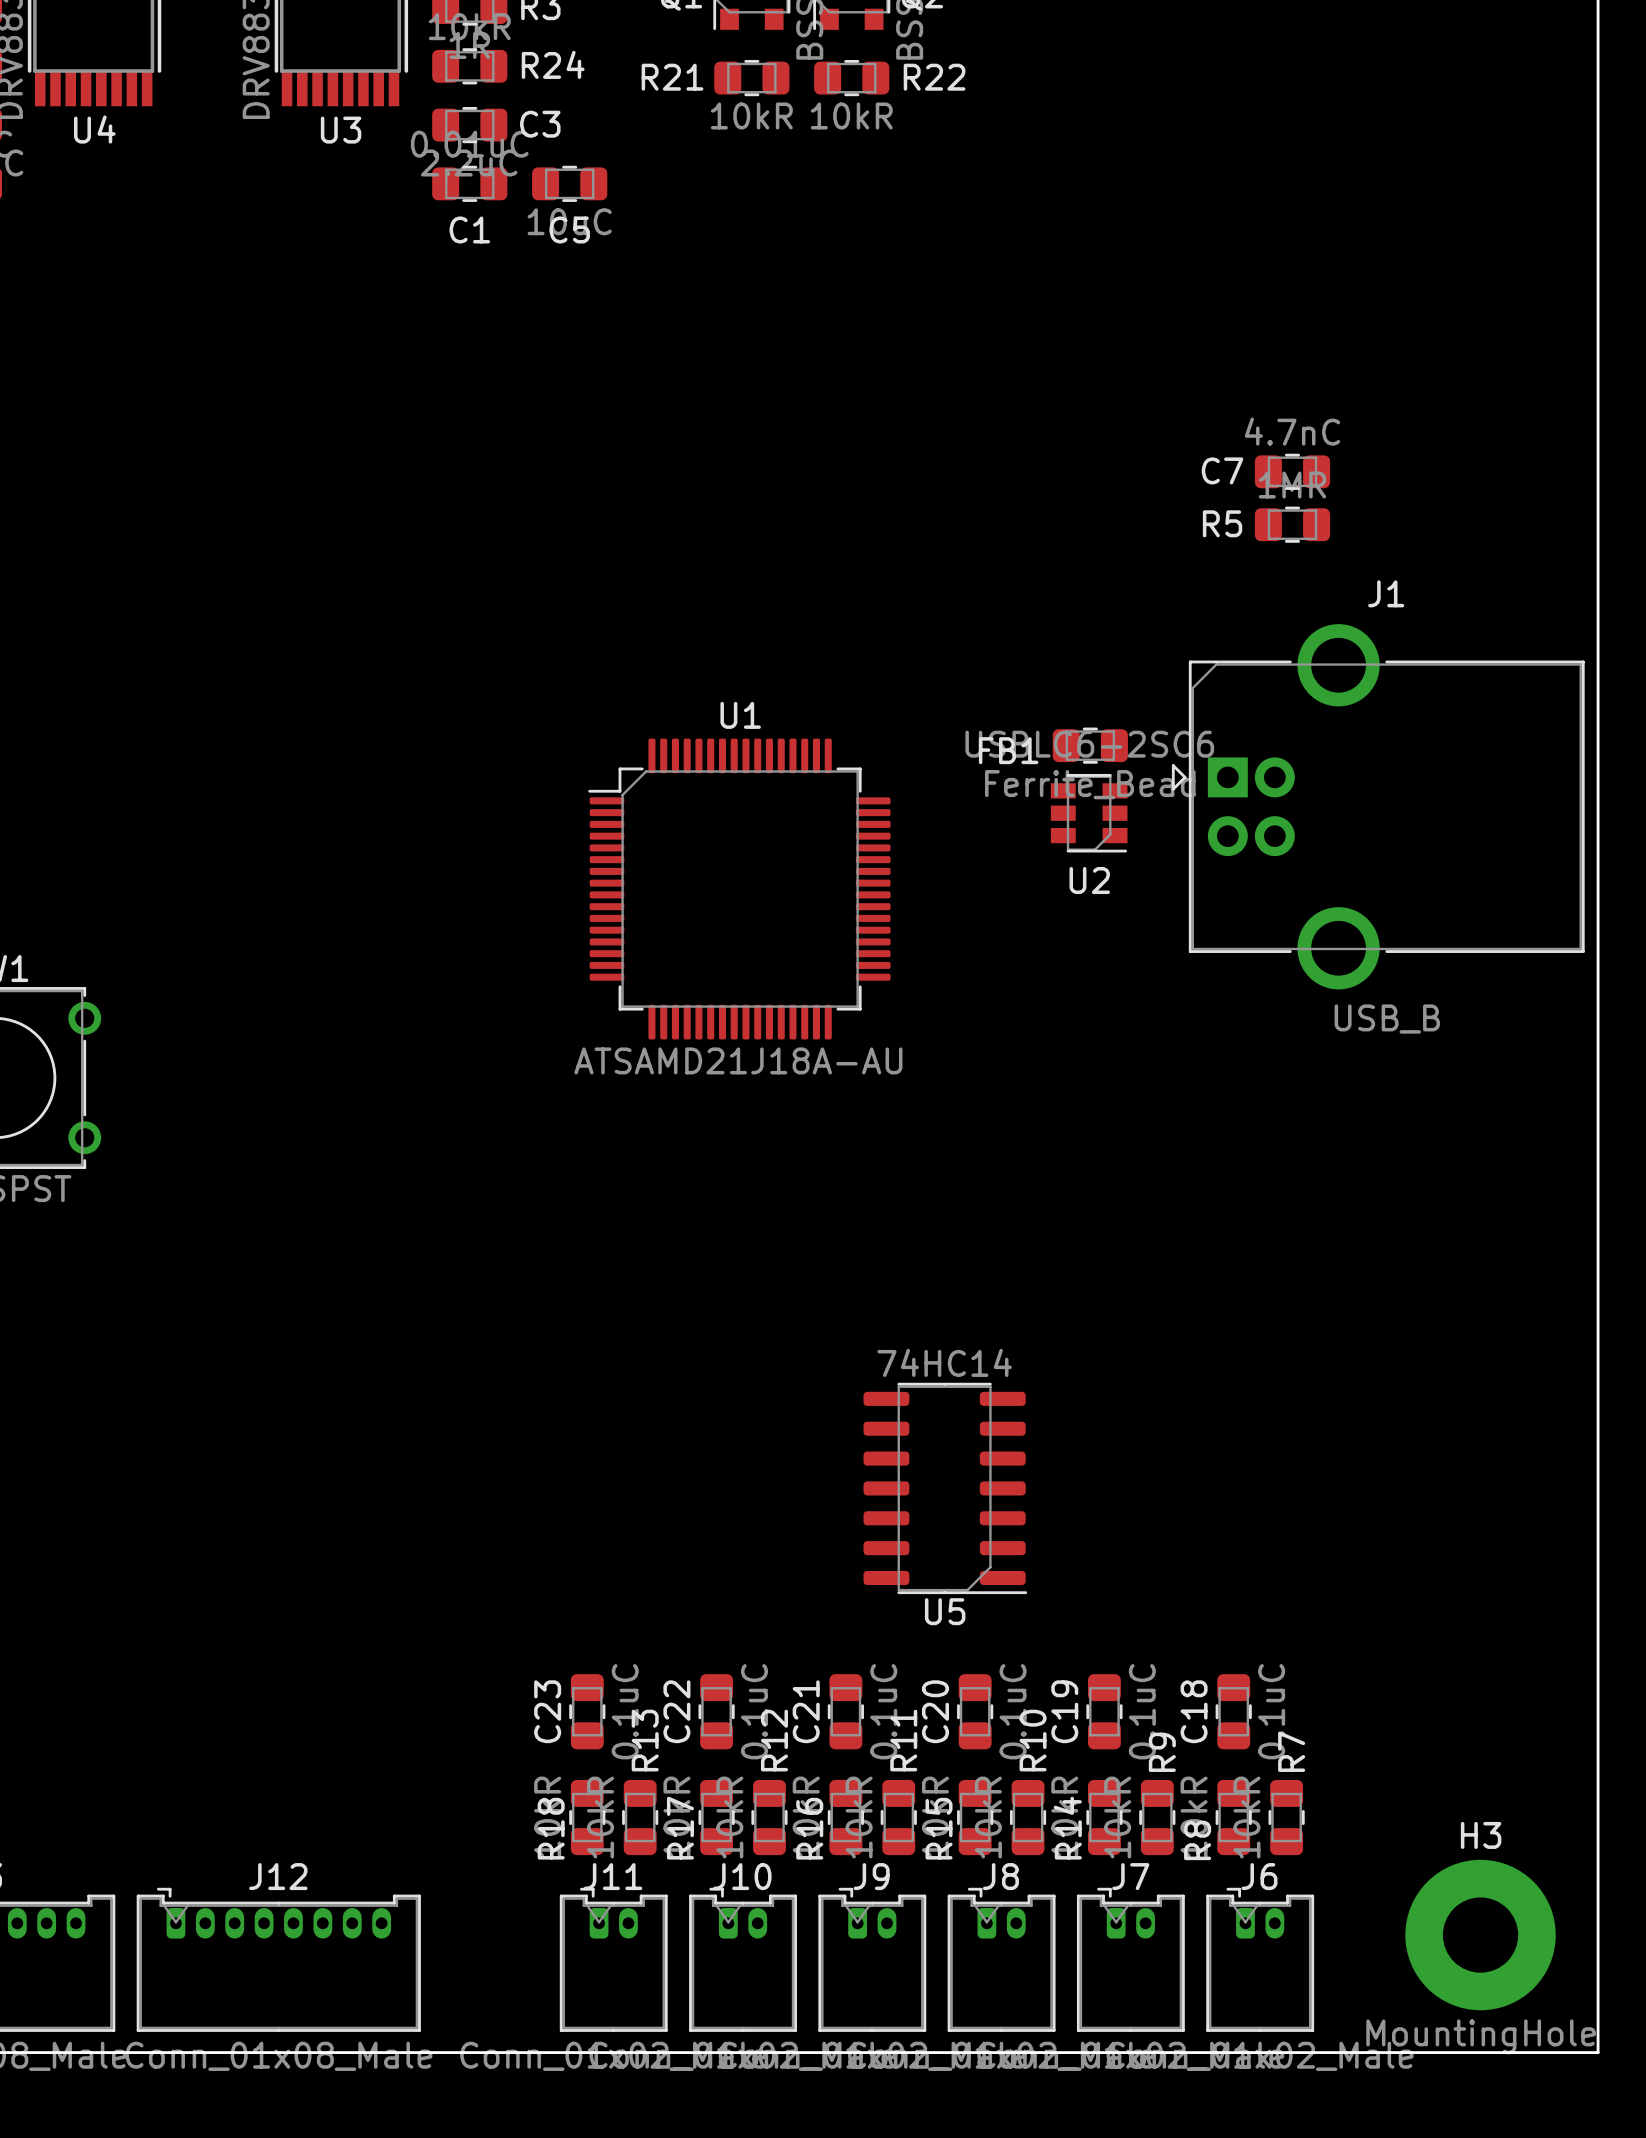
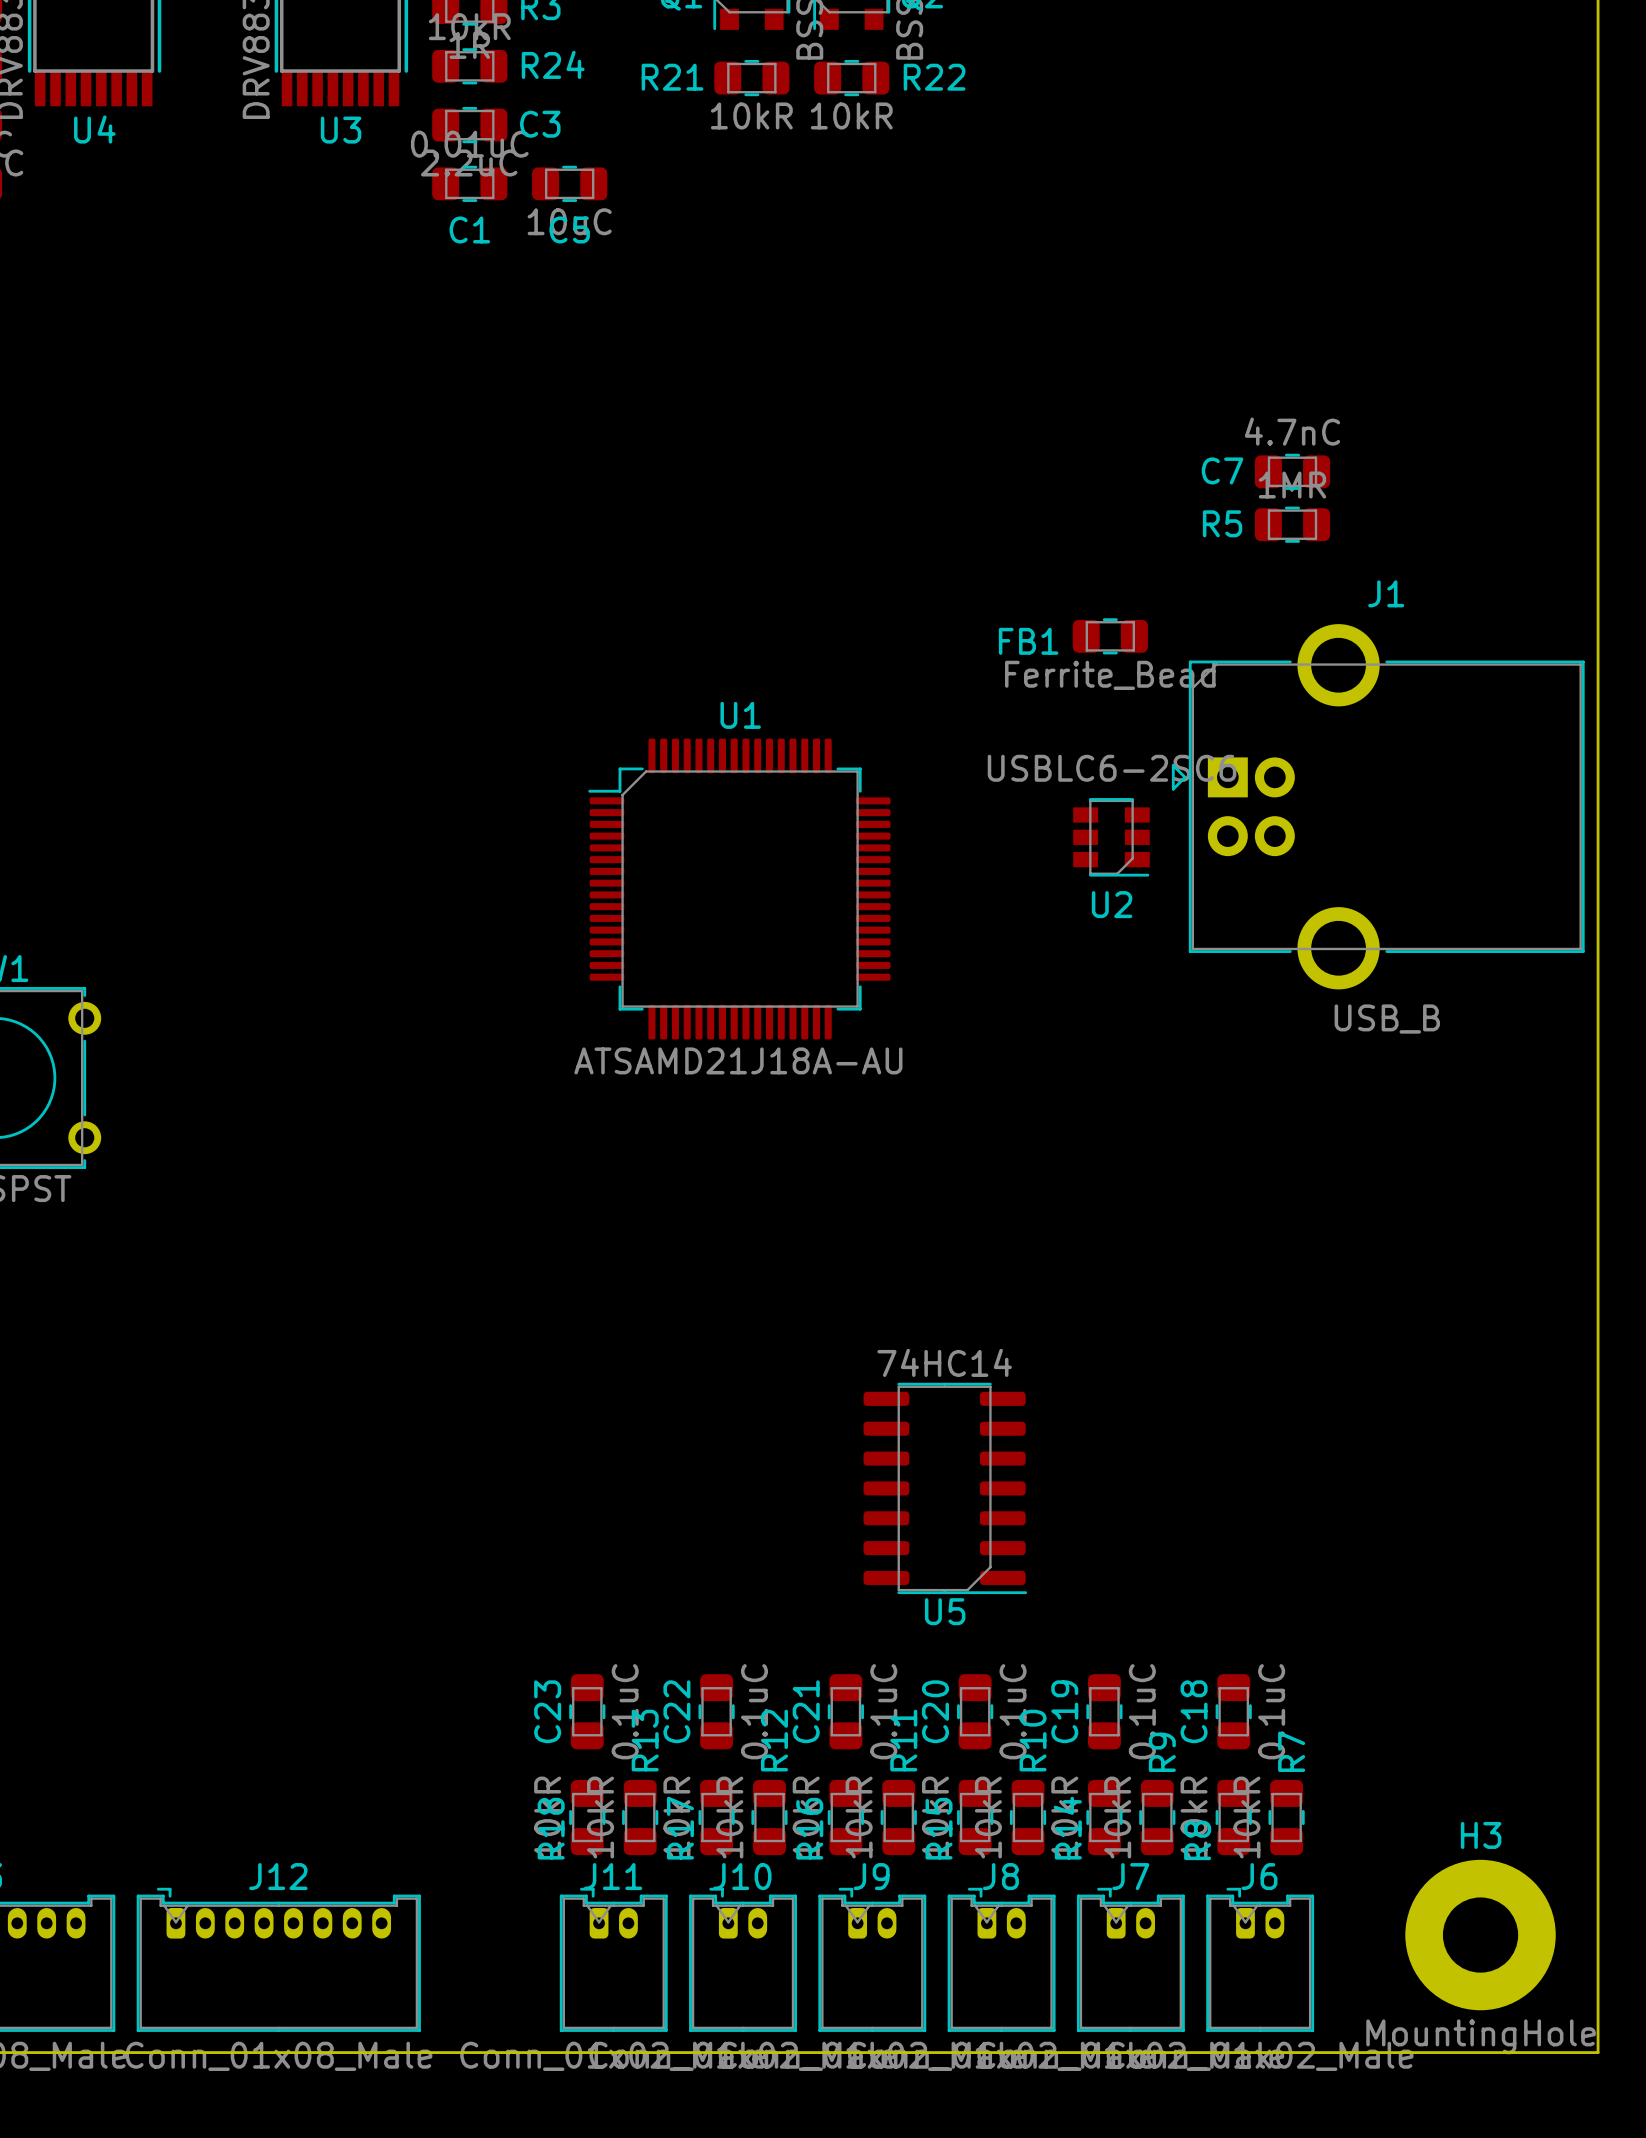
FB1 position: (1090, 745) -> (1110, 636)
U2 position: (1089, 813) -> (1111, 837)

